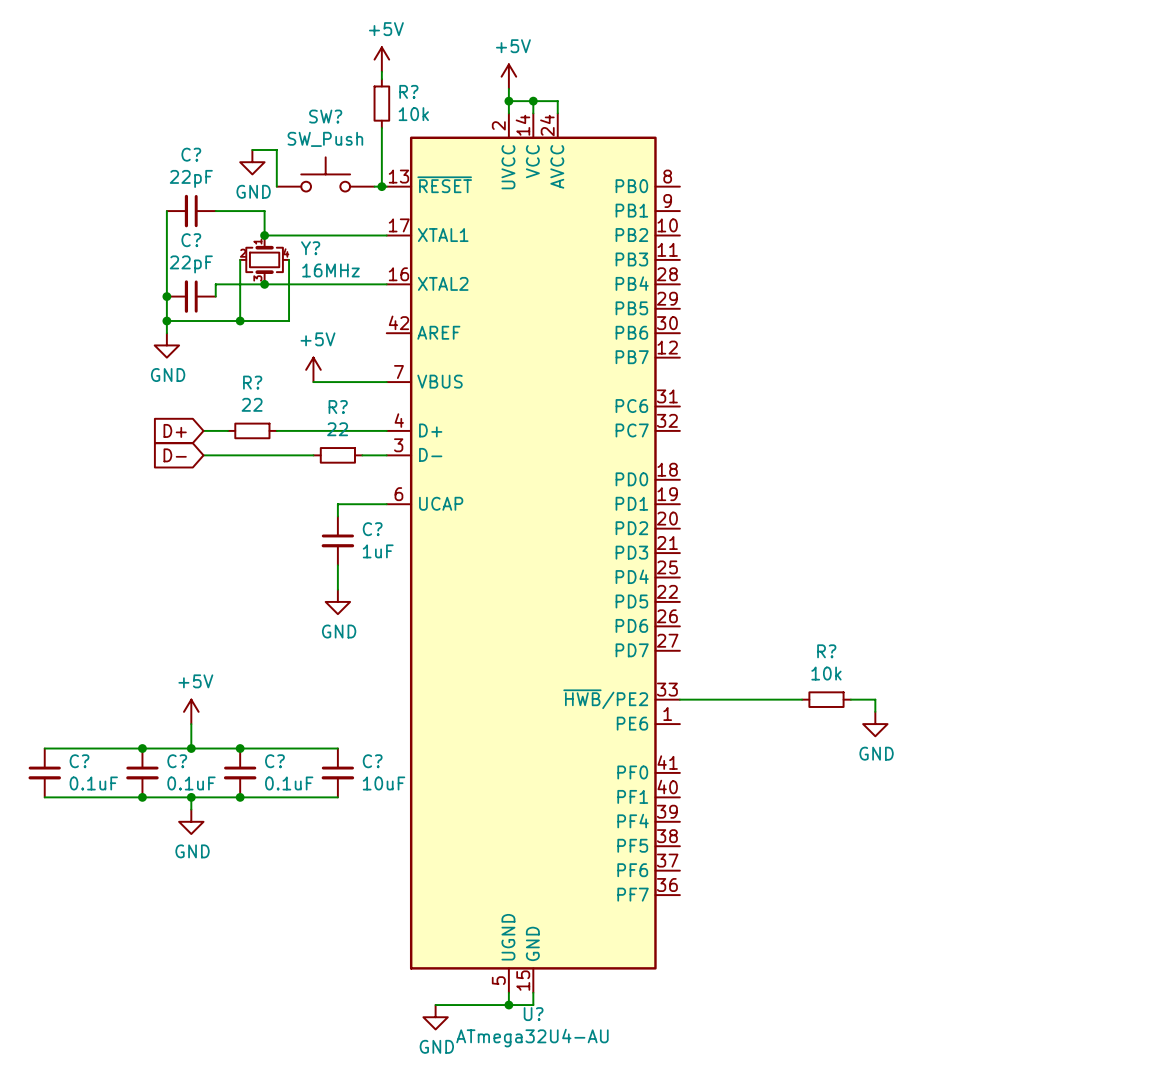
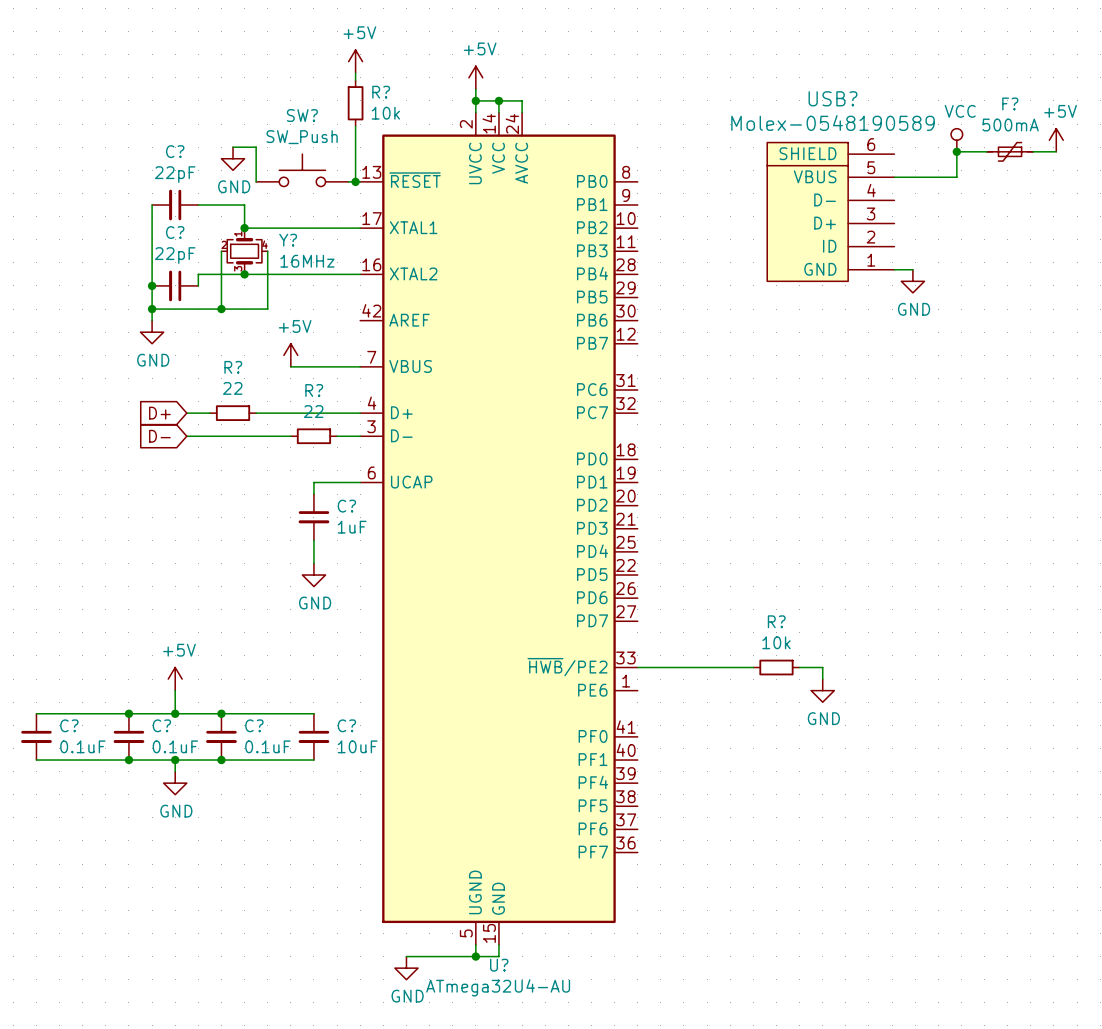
power symbol: none -> VCC (956, 140)
power symbol: none -> +5V (1056, 140)
junction: none -> (956, 151)
wire: none -> (986, 151) (956, 151) (956, 177) (894, 177)
F?: none -> 500mA (1010, 151)
wire: none -> (1033, 151) (1056, 151)
USB?: none -> Molex-0548190589 (830, 211)
wire: none -> (894, 269) (912, 269)
power symbol: none -> GND (912, 281)

